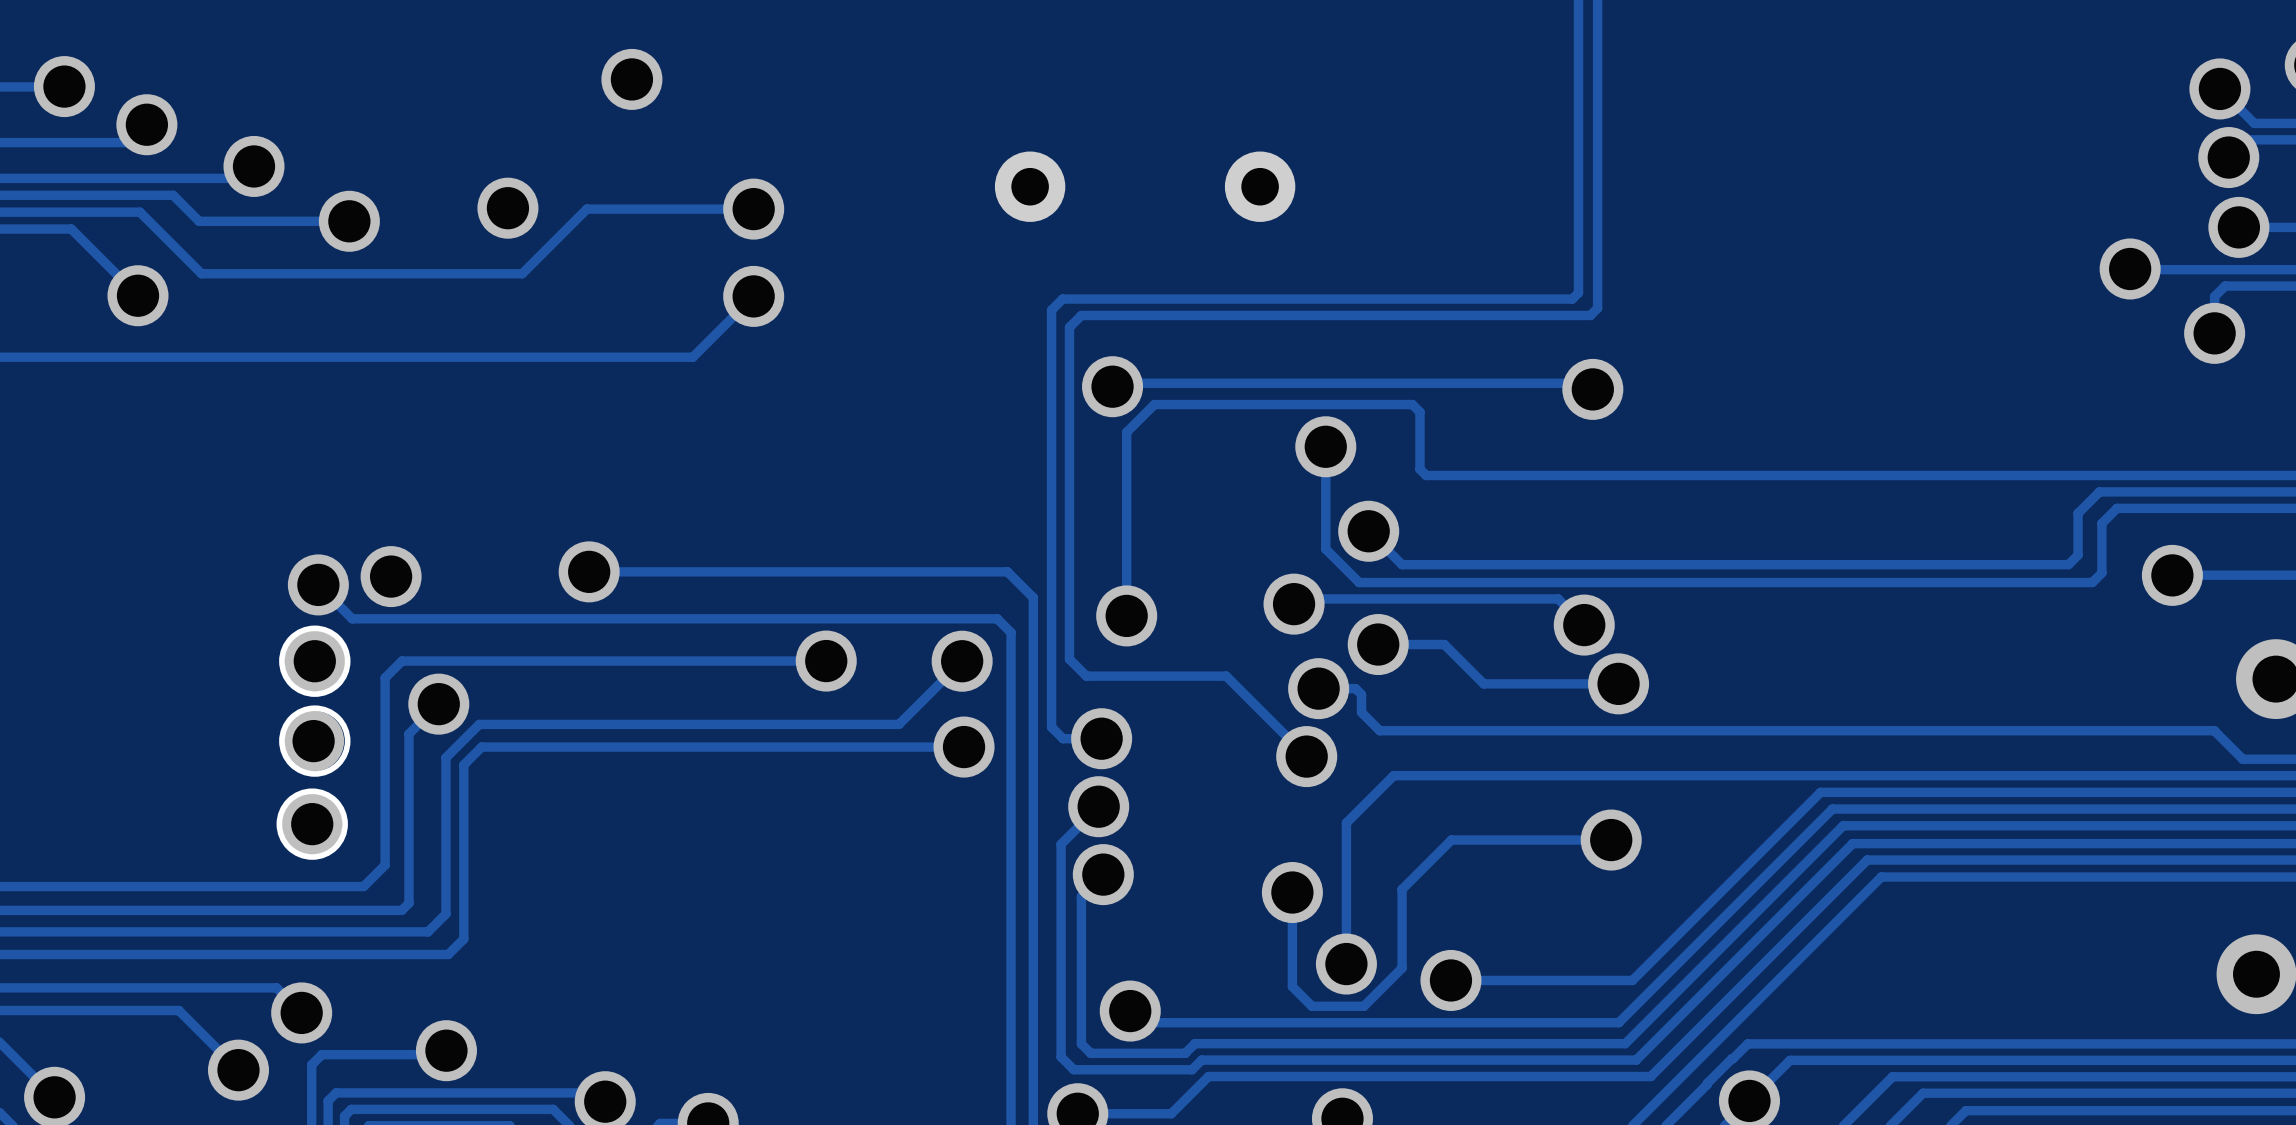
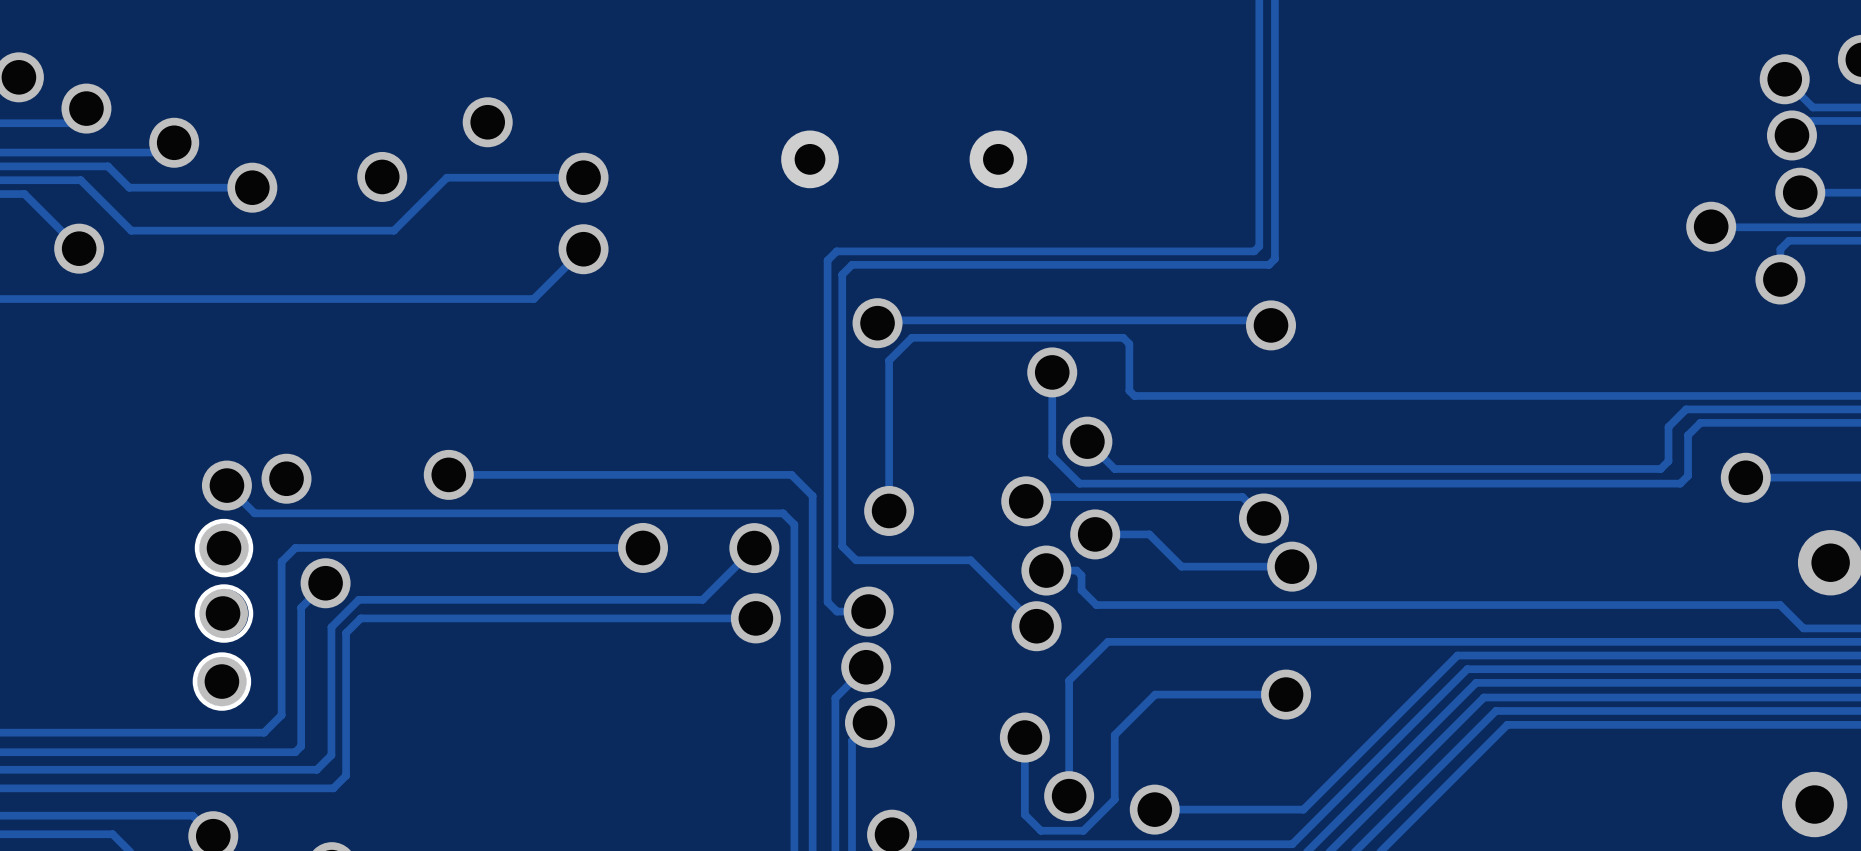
via position: (631, 79) -> (487, 122)

